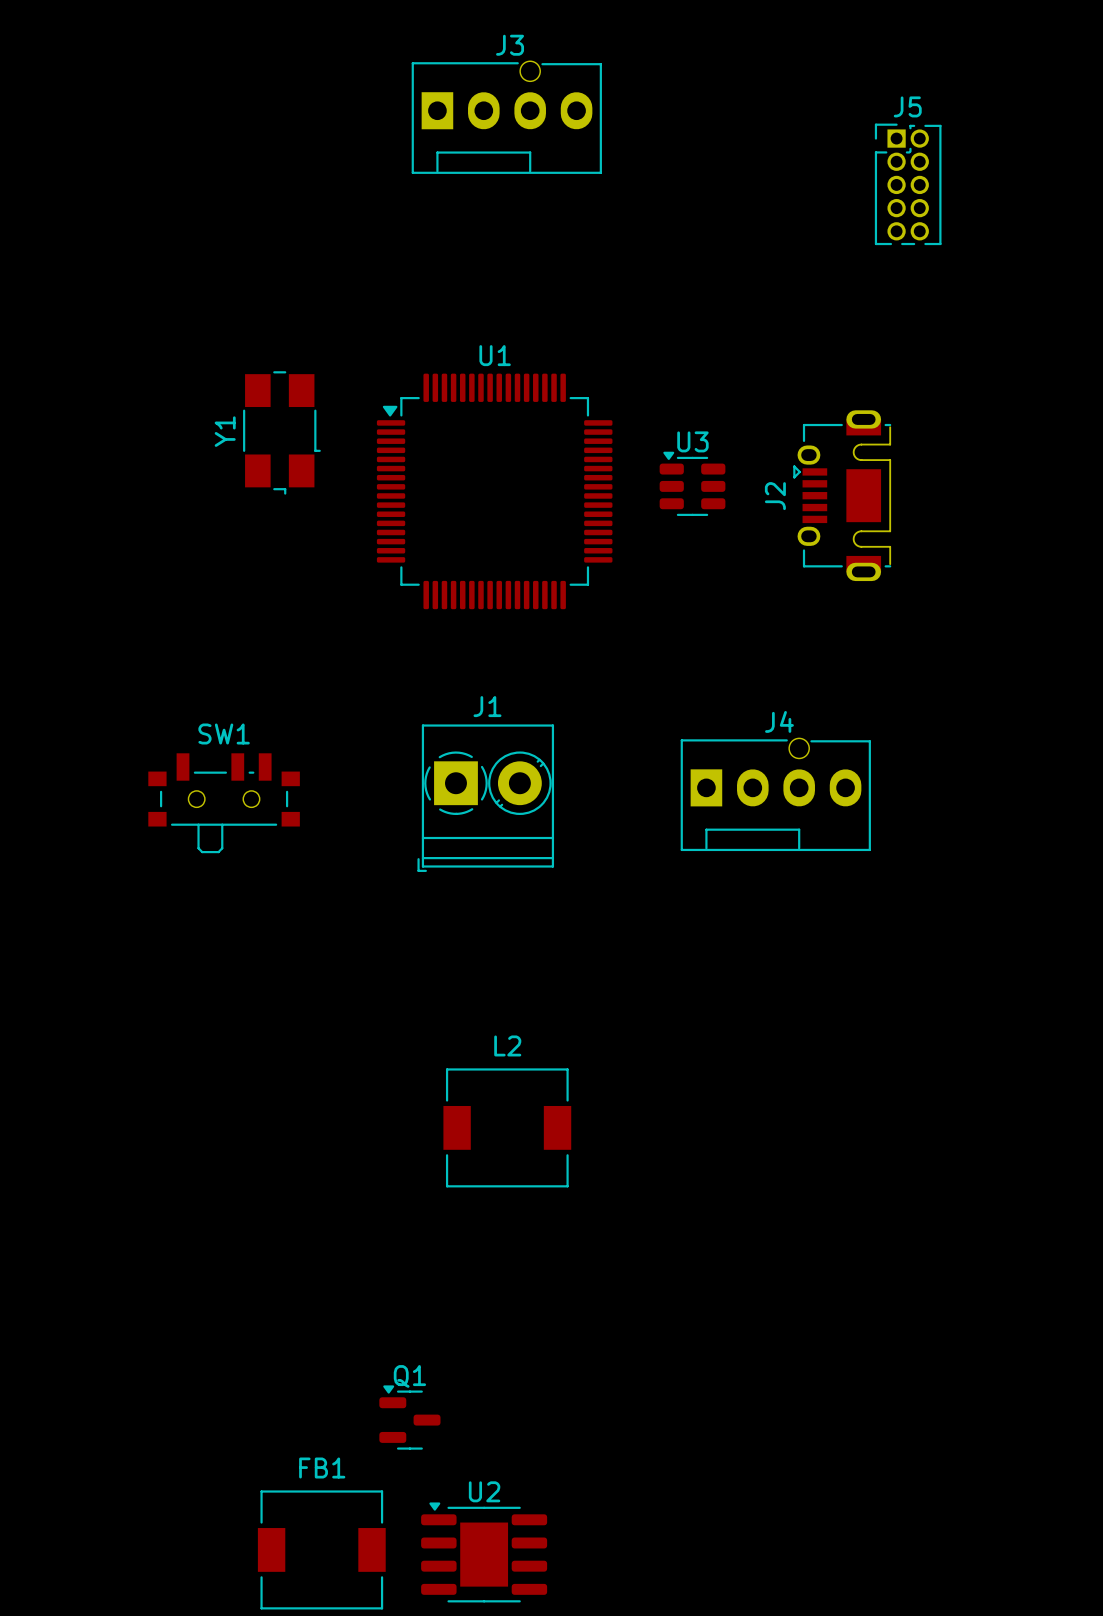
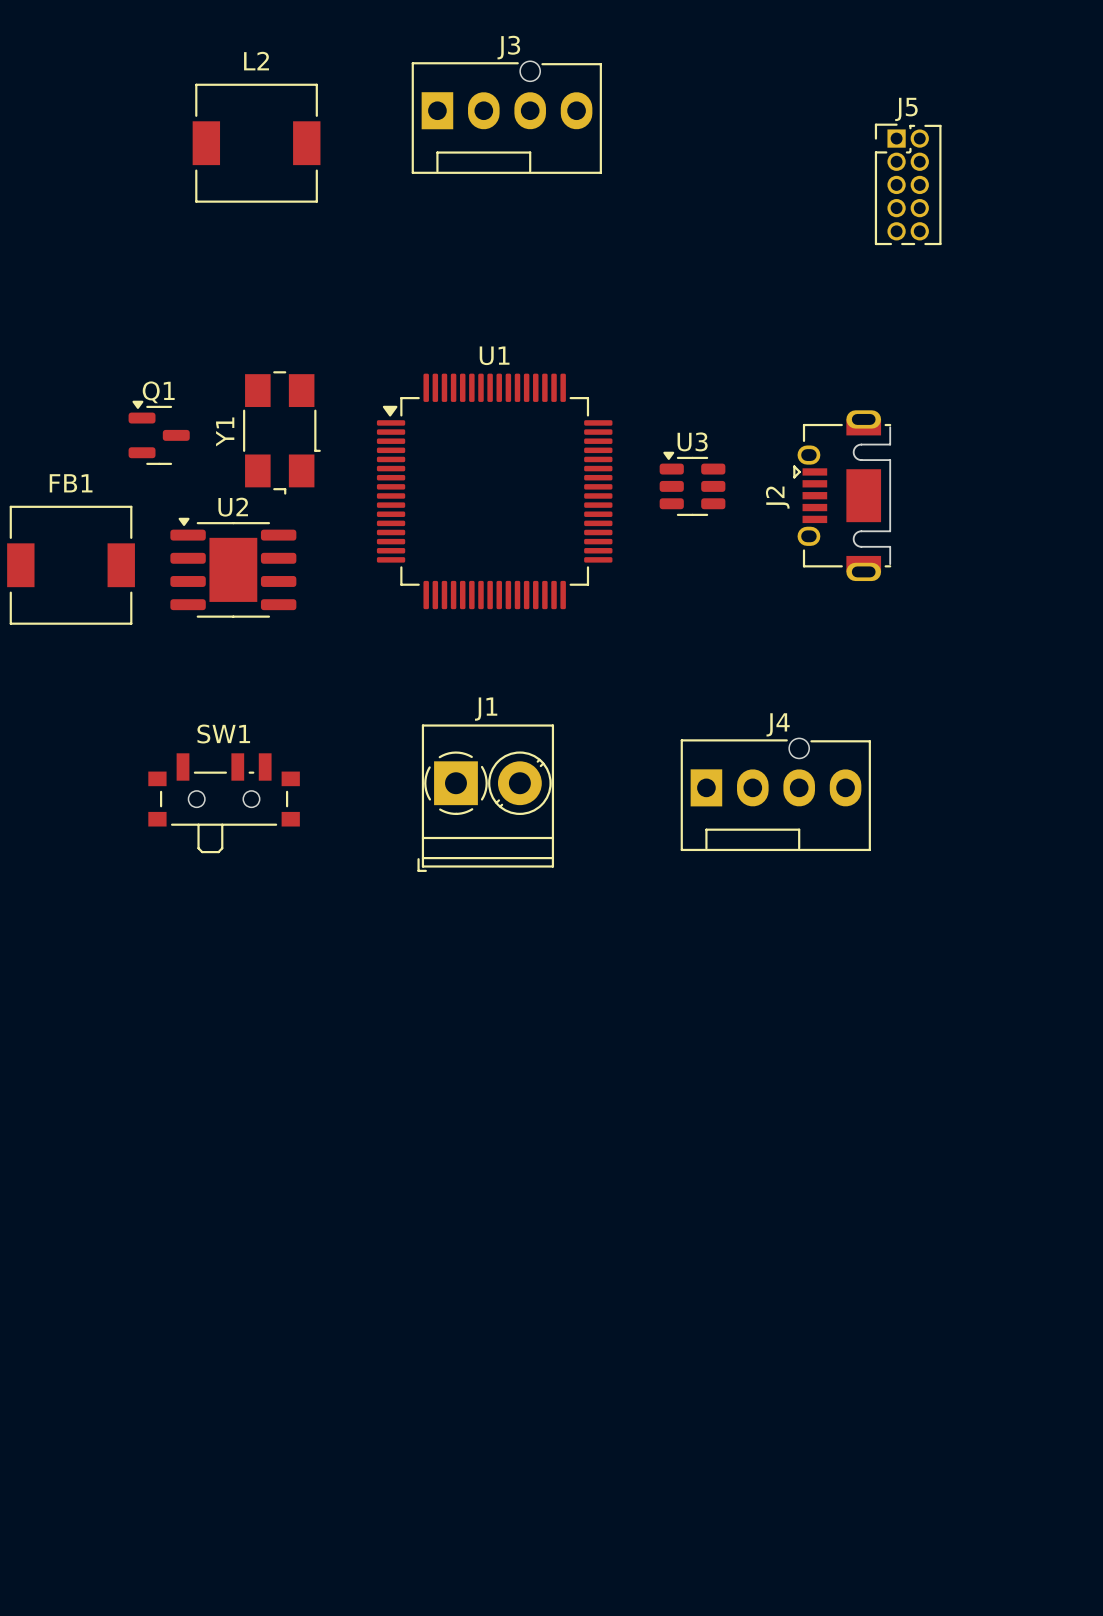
L2 position: (507, 1127) -> (256, 143)
Q1 position: (409, 1417) -> (159, 432)
FB1 position: (321, 1549) -> (71, 565)
U2 position: (484, 1552) -> (233, 567)

